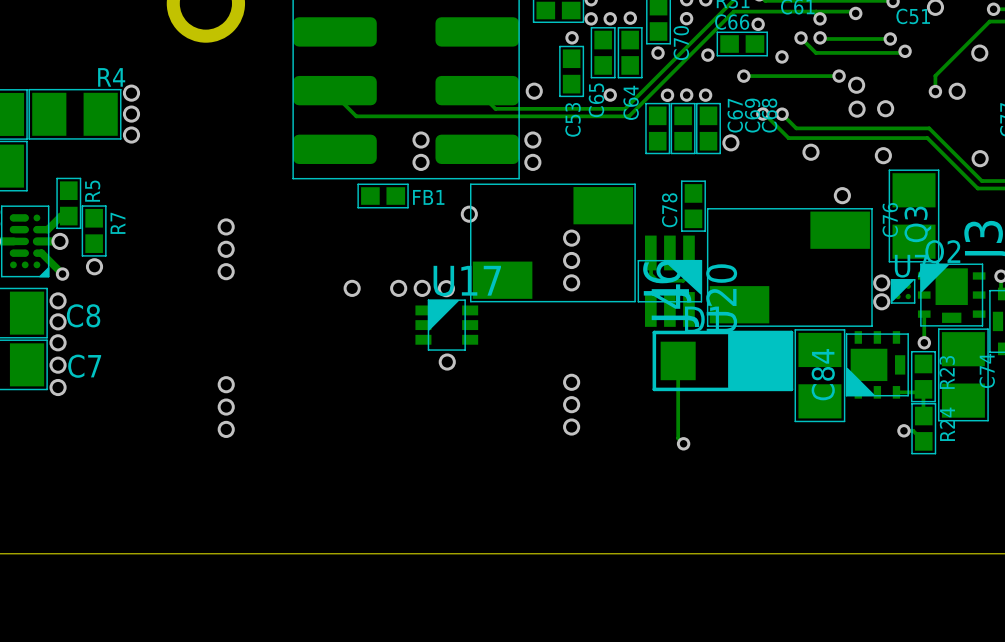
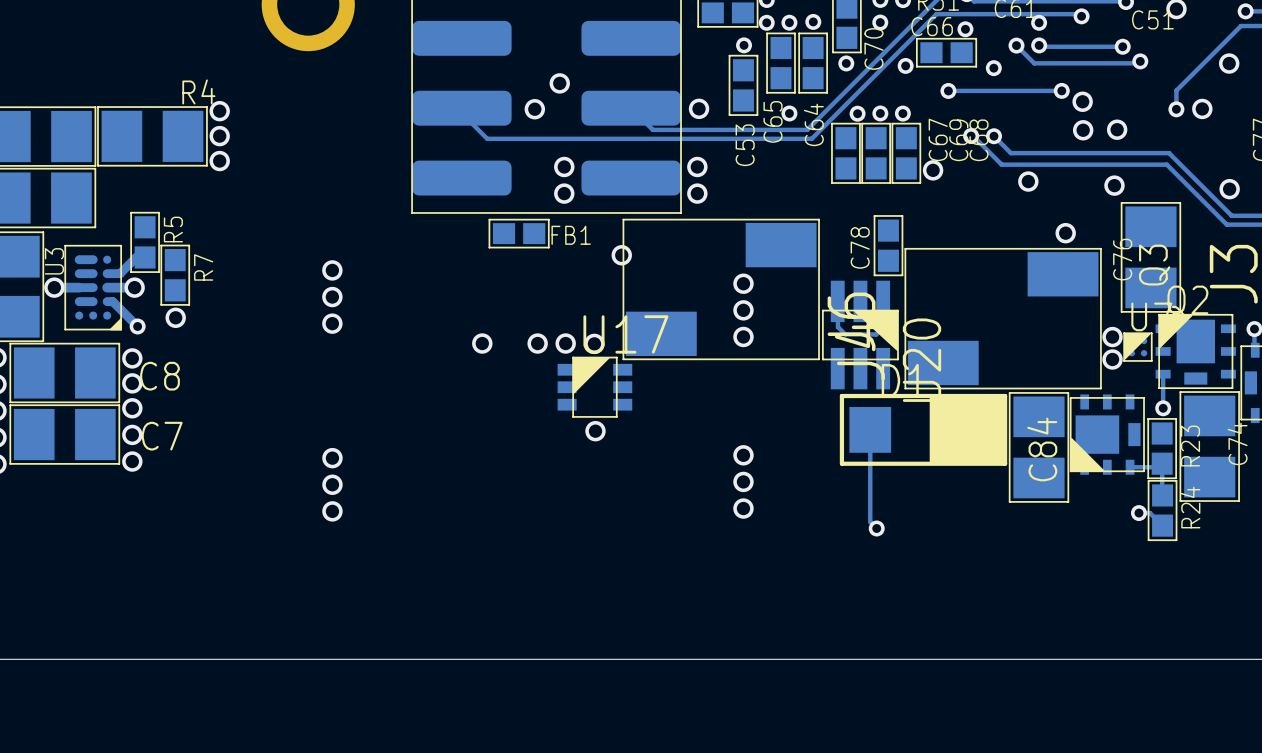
via: none -> (559, 83)
via: none -> (534, 109)

